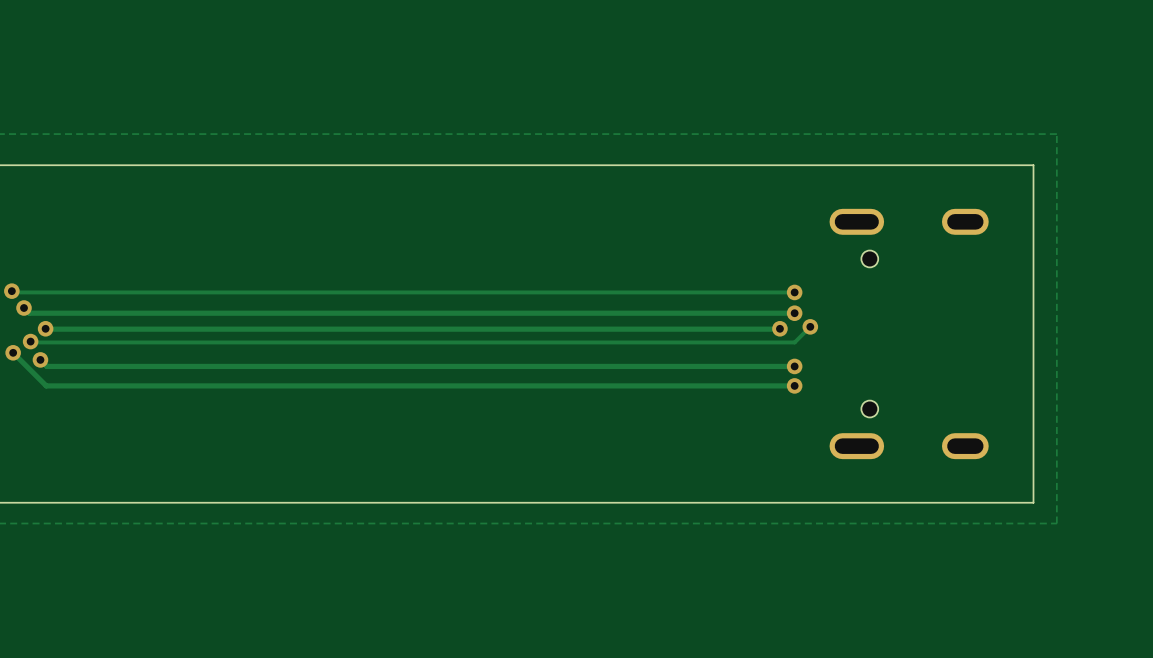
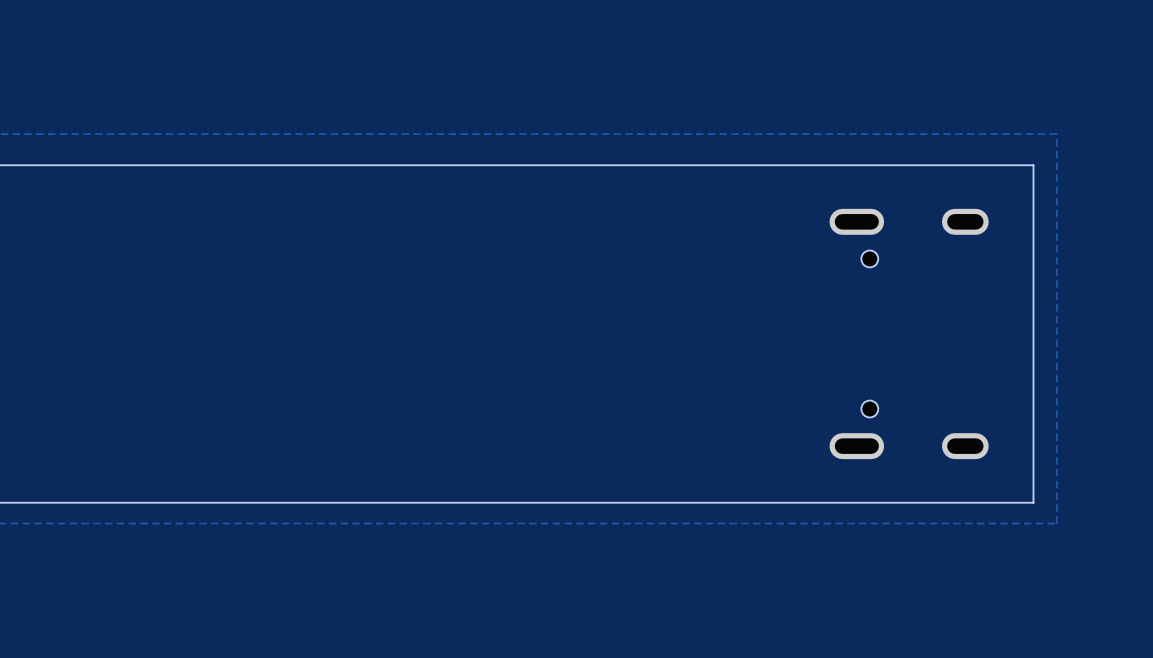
track: (11, 291) (794, 292) -> none
via: (11, 291) -> none
via: (794, 292) -> none
track: (23, 308) (29, 313) (794, 313) -> none
via: (23, 308) -> none
via: (794, 313) -> none
track: (810, 326) (794, 342) (30, 341) -> none
via: (810, 326) -> none
via: (45, 328) -> none
track: (779, 328) (45, 328) -> none
via: (779, 328) -> none
via: (30, 341) -> none
track: (13, 352) (46, 385) (794, 385) -> none
via: (13, 352) -> none
track: (40, 359) (46, 366) (794, 366) -> none
via: (40, 359) -> none
via: (794, 366) -> none
via: (794, 385) -> none

